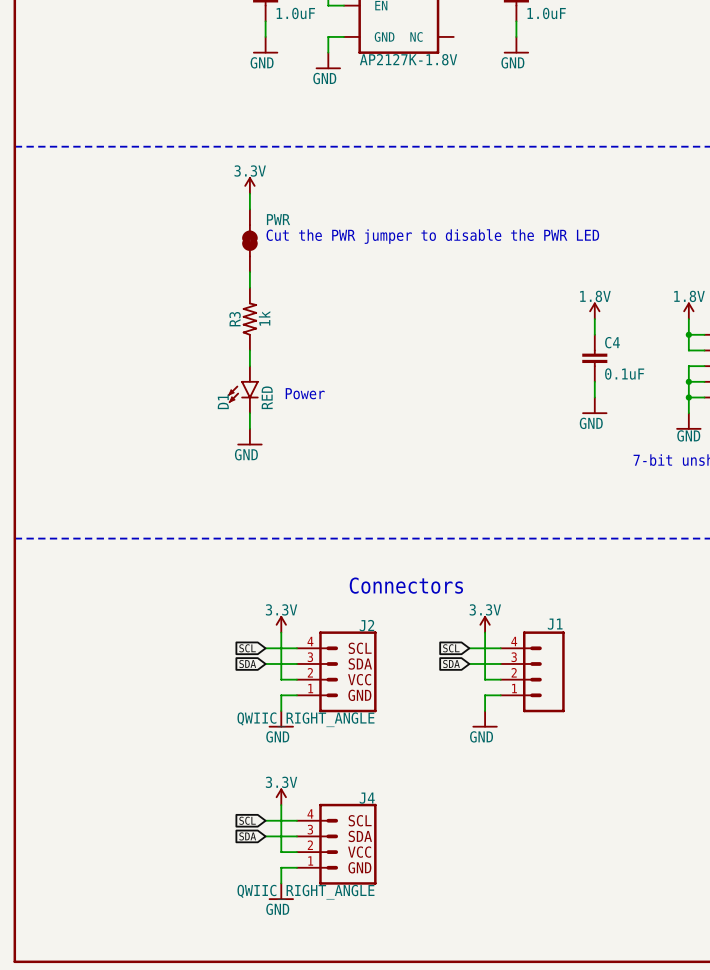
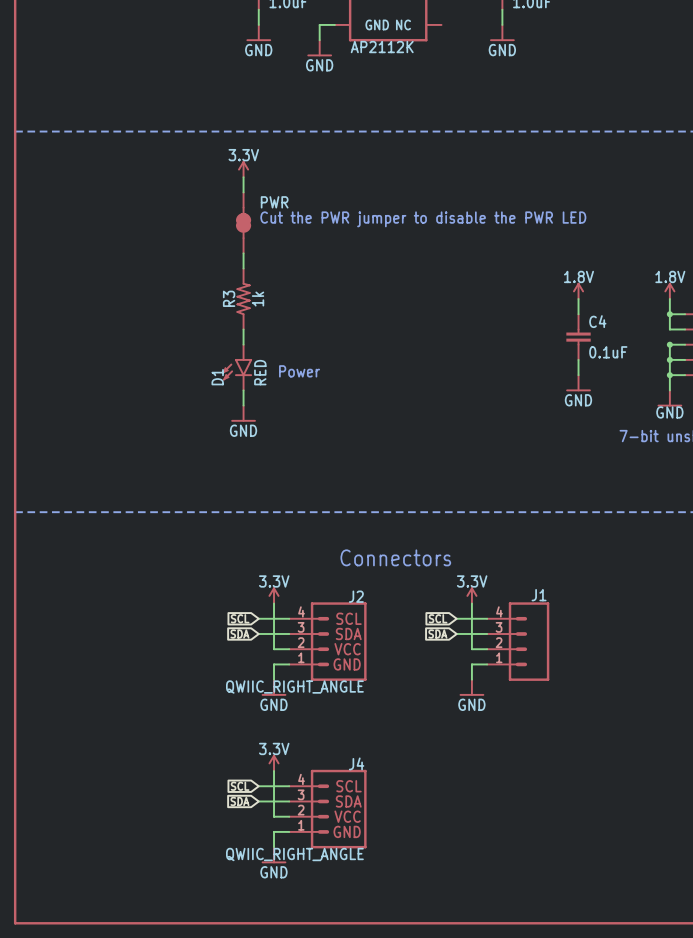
part value: AP2127K-1.8V (408, 59) -> AP2112K (382, 47)
junction: none -> (669, 344)

